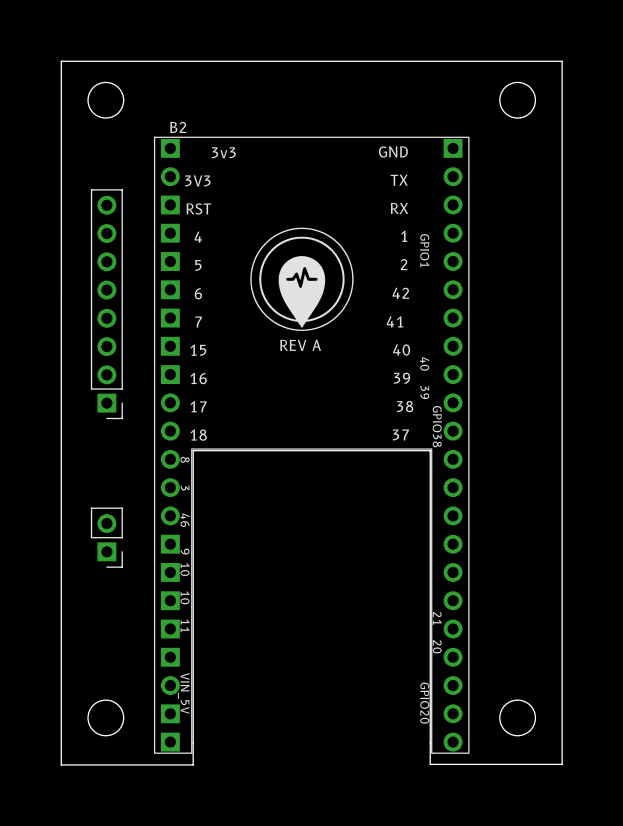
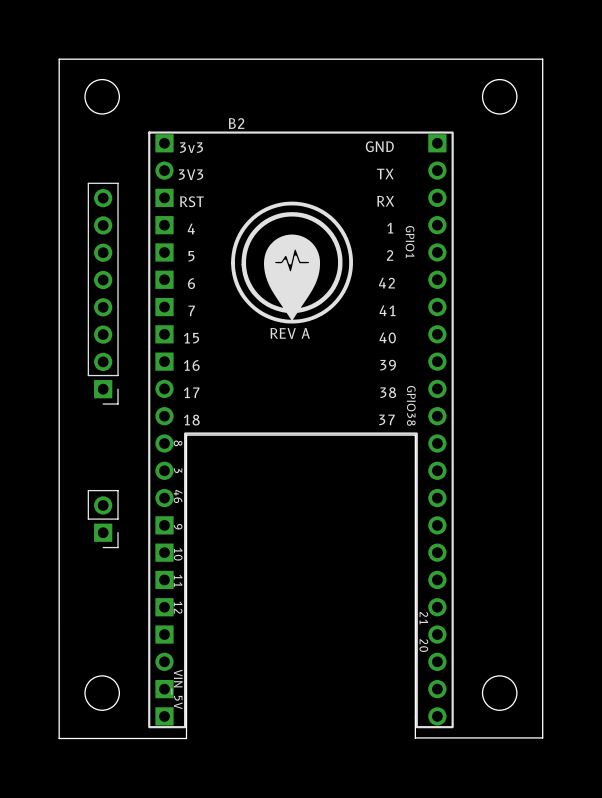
B2 name position: B2 (178, 127) -> B2 (236, 123)
B2 footprint: [154, 137, 470, 754] -> [148, 131, 454, 729]
drawing shape: [250, 227, 354, 332] -> [231, 201, 353, 324]

